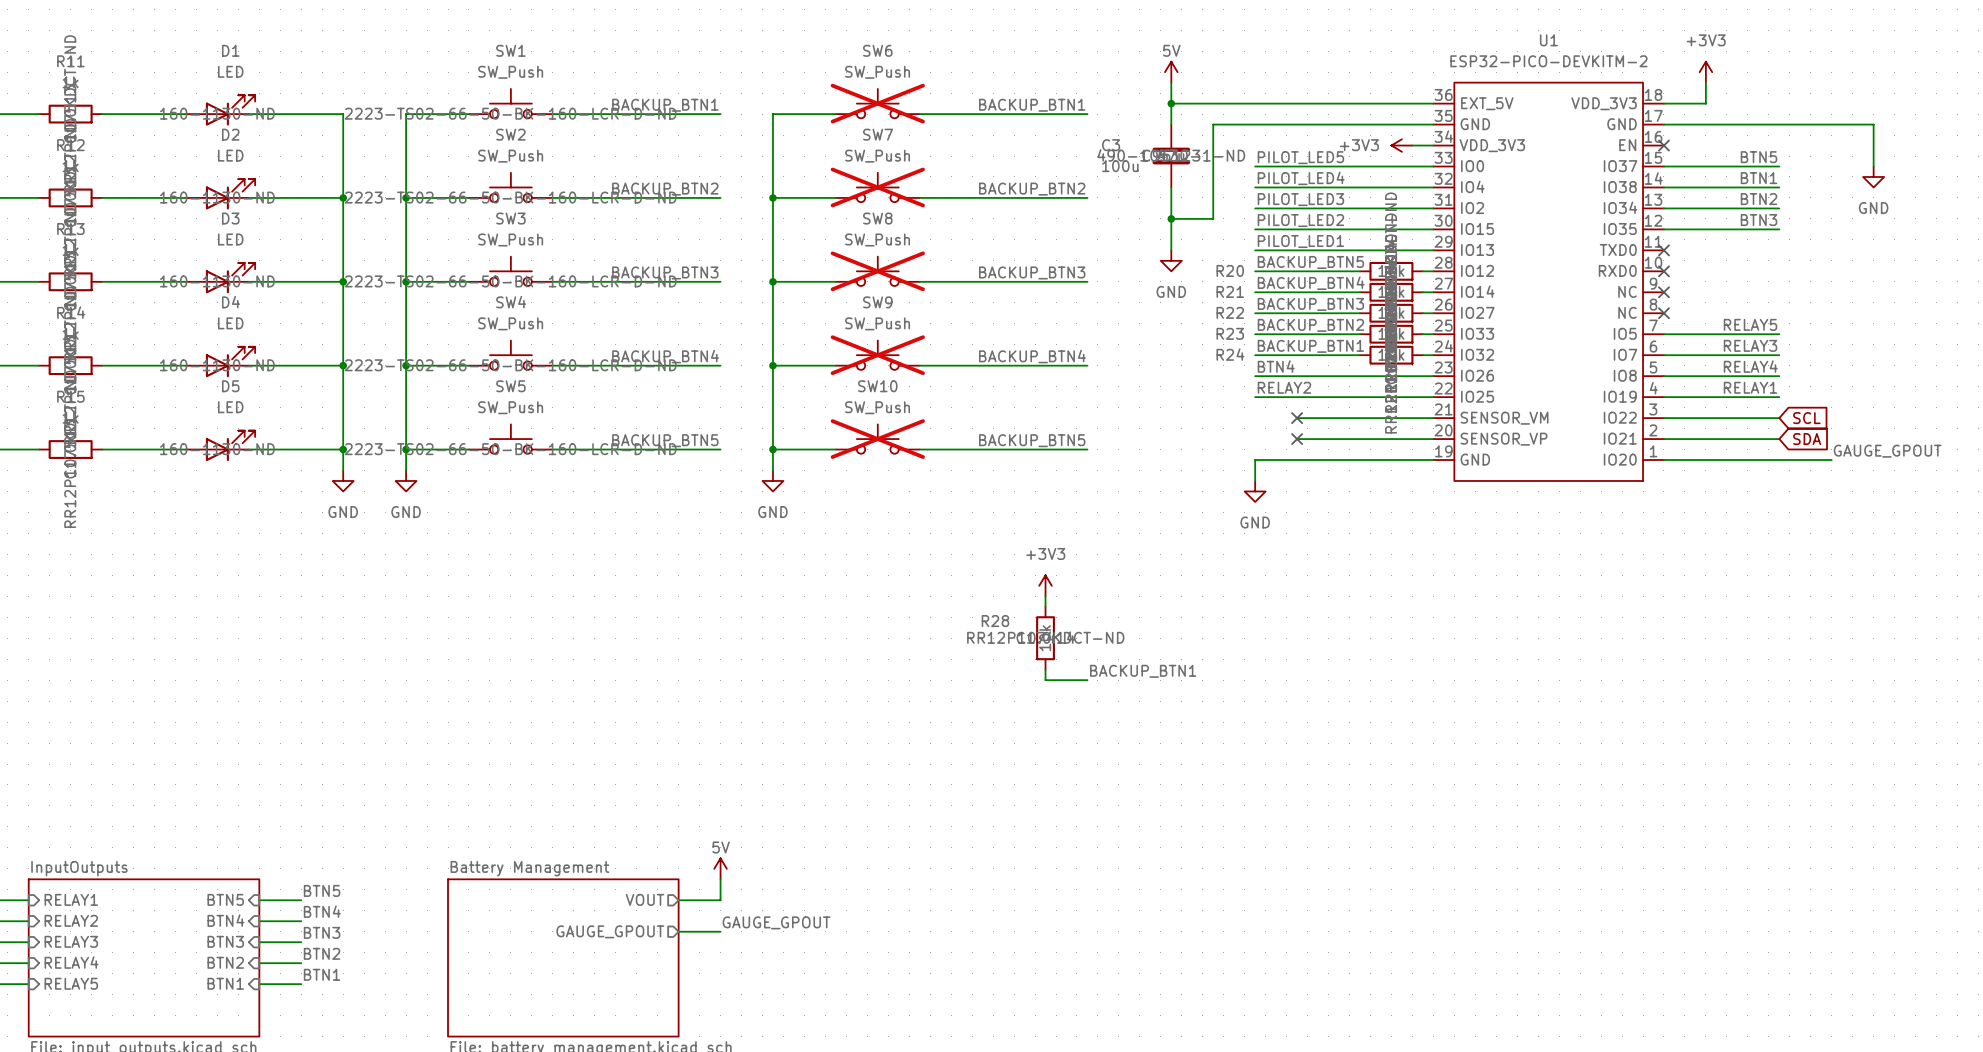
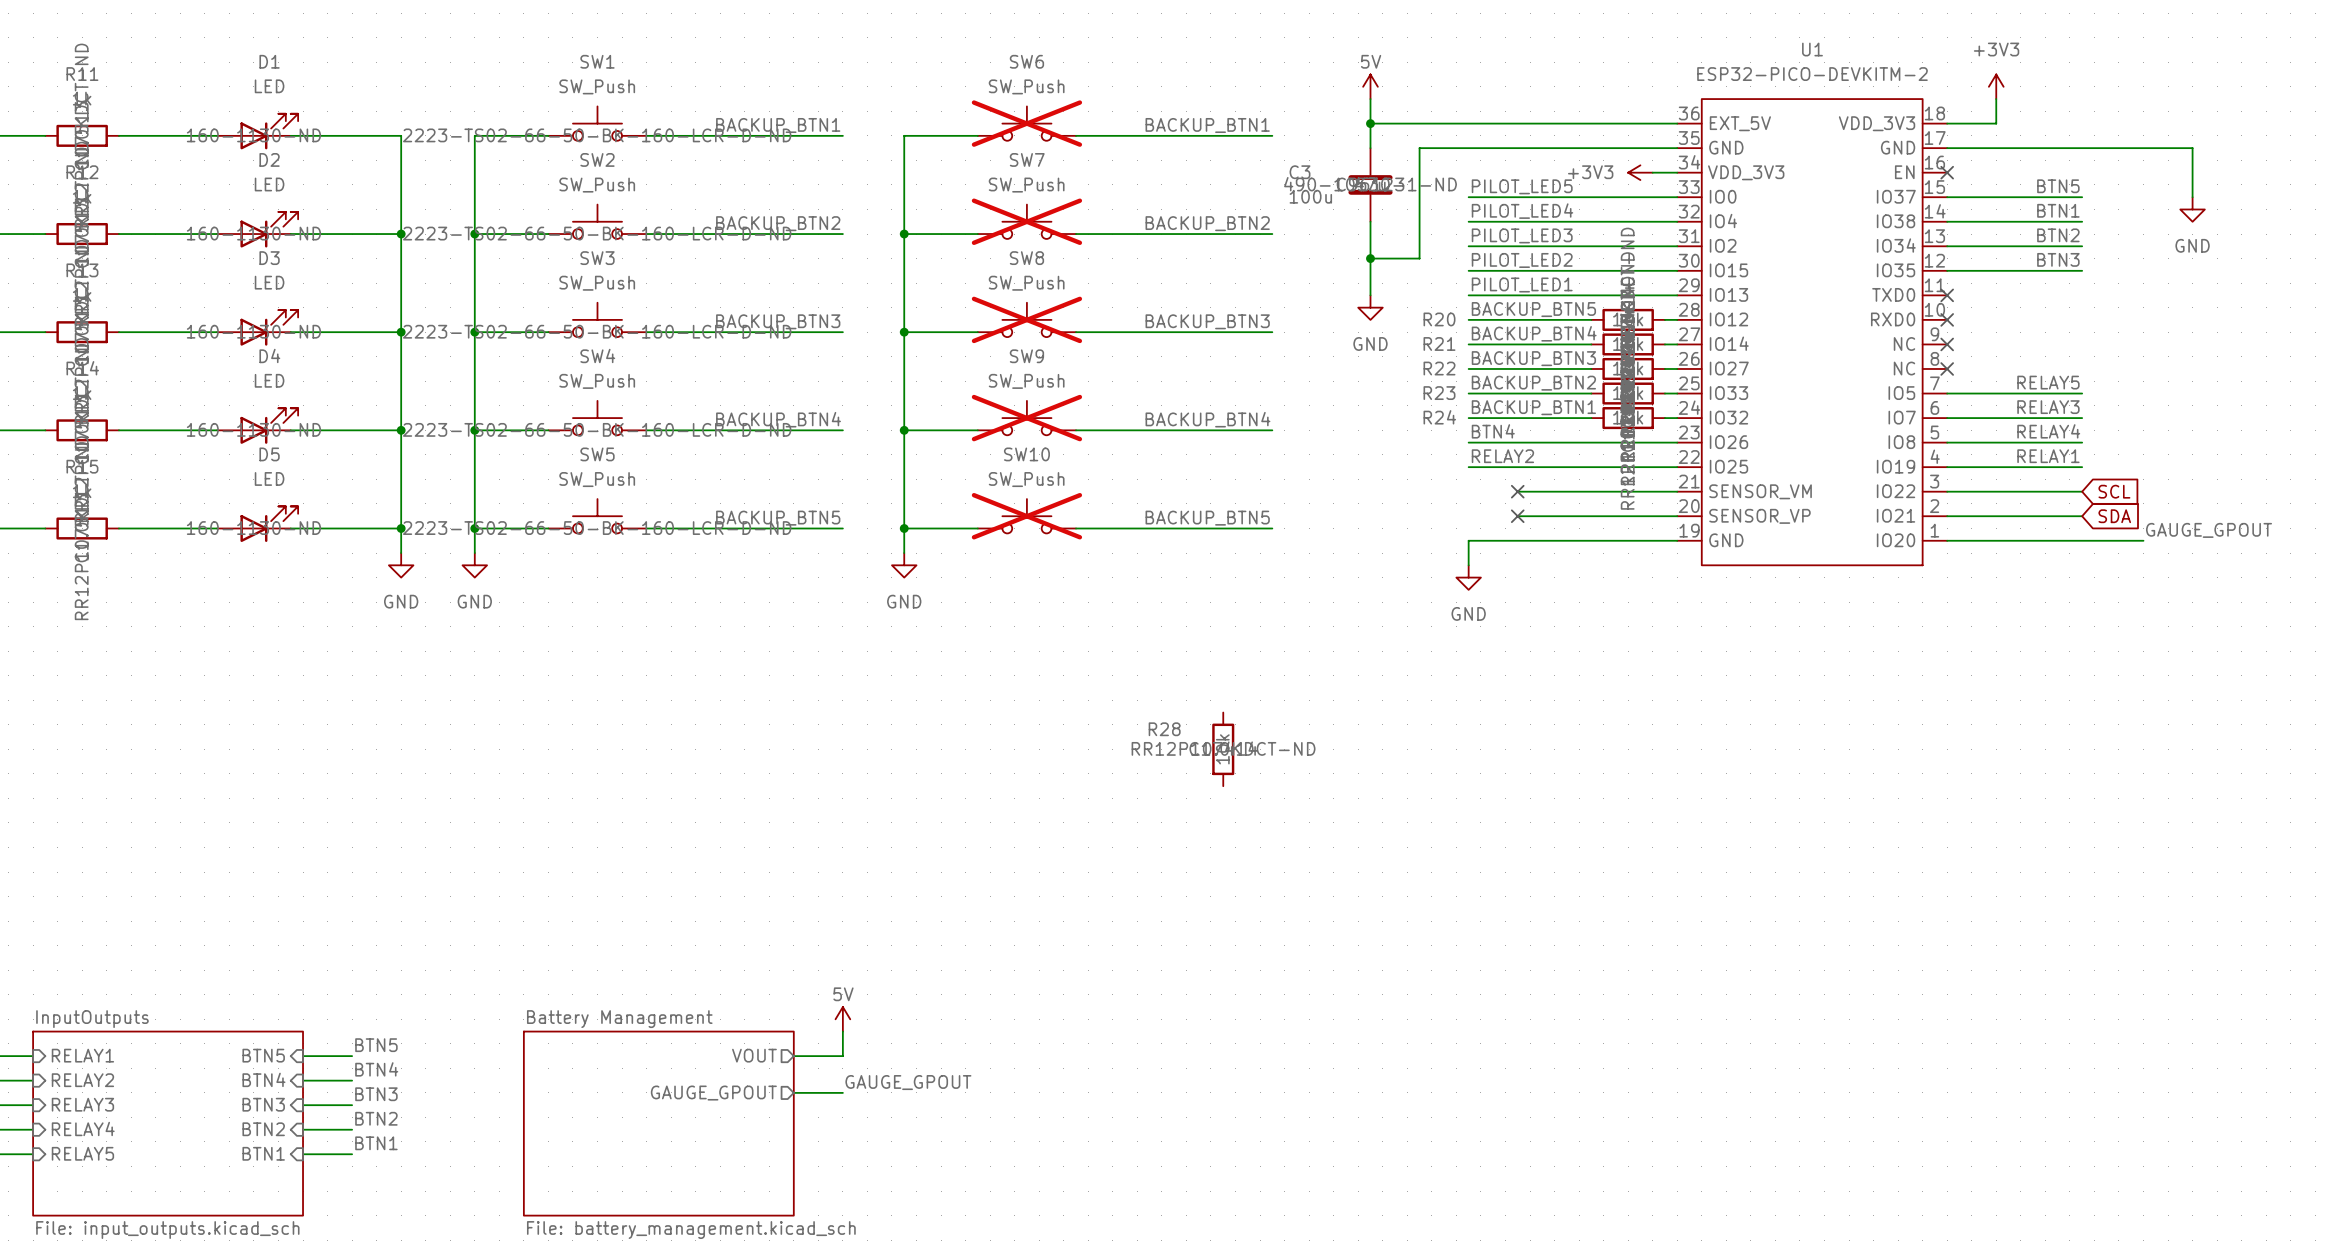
power symbol: +3V3 (1045, 585) -> none
wire: (1045, 596) (1045, 606) -> none
wire: (1045, 669) (1045, 680) (1087, 680) -> none
label: BACKUP_BTN1 (1143, 671) -> none

